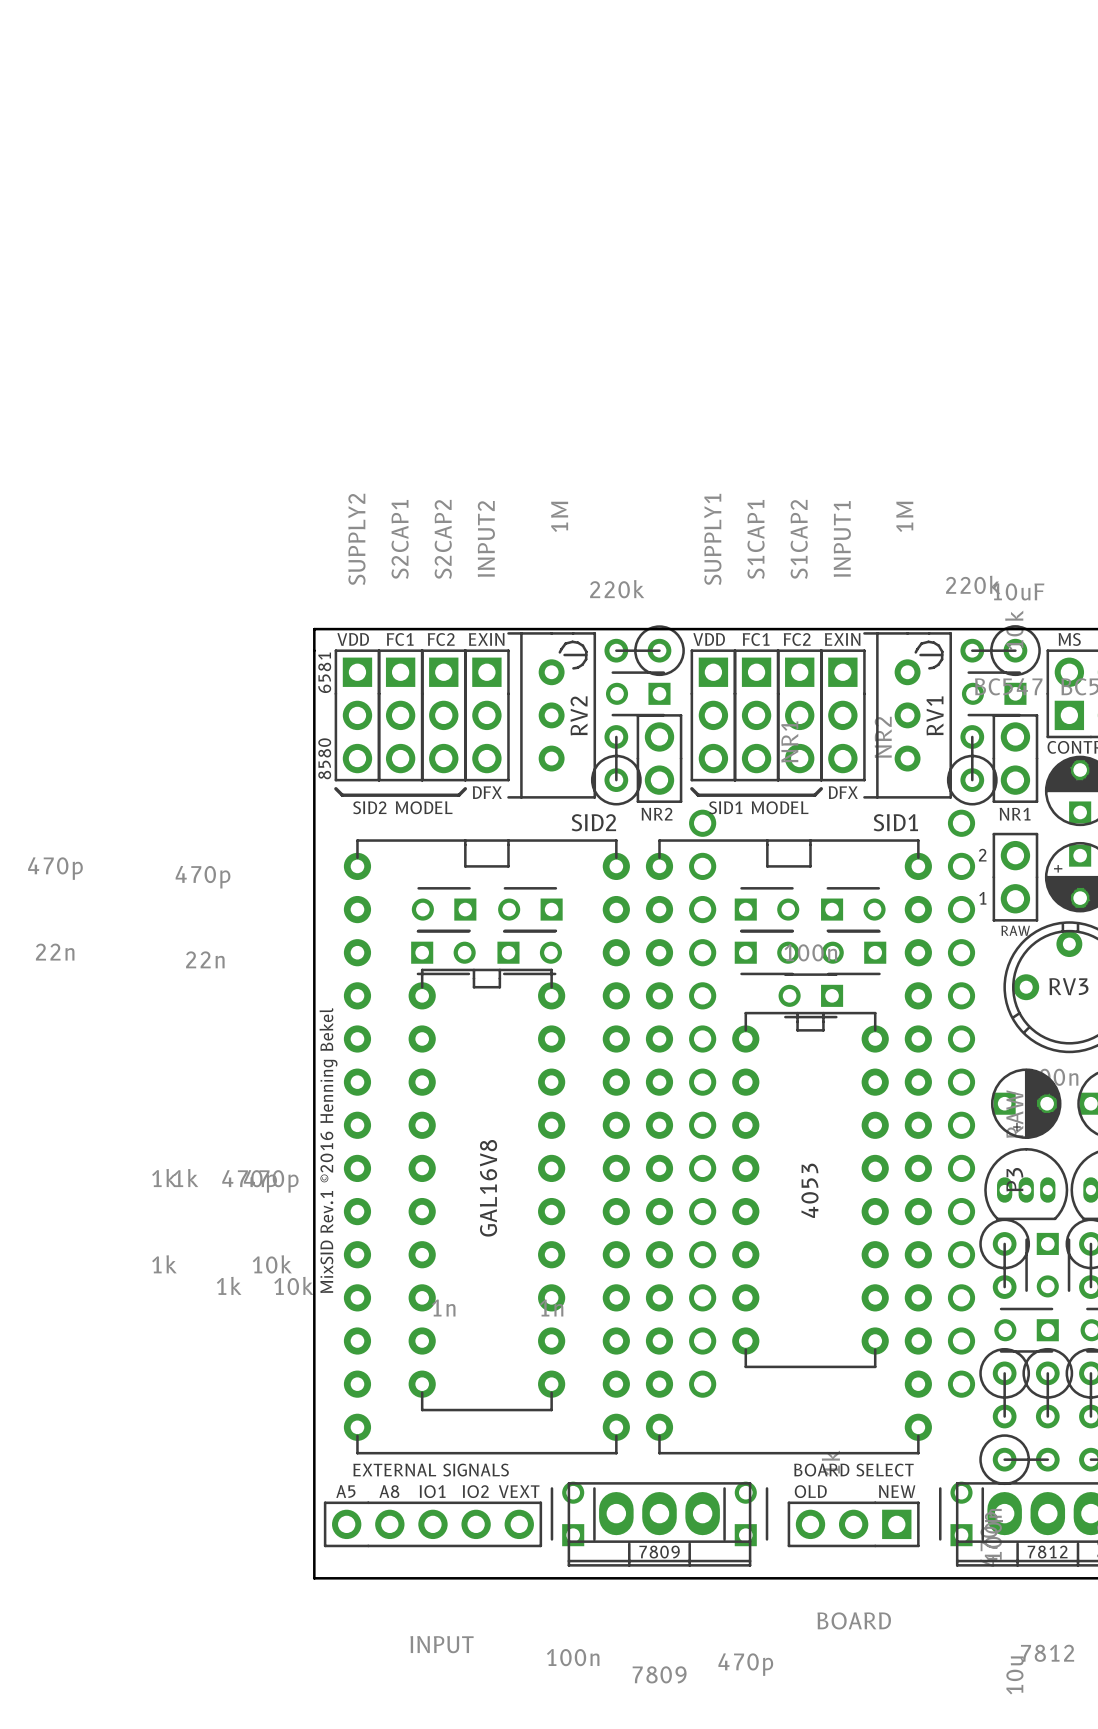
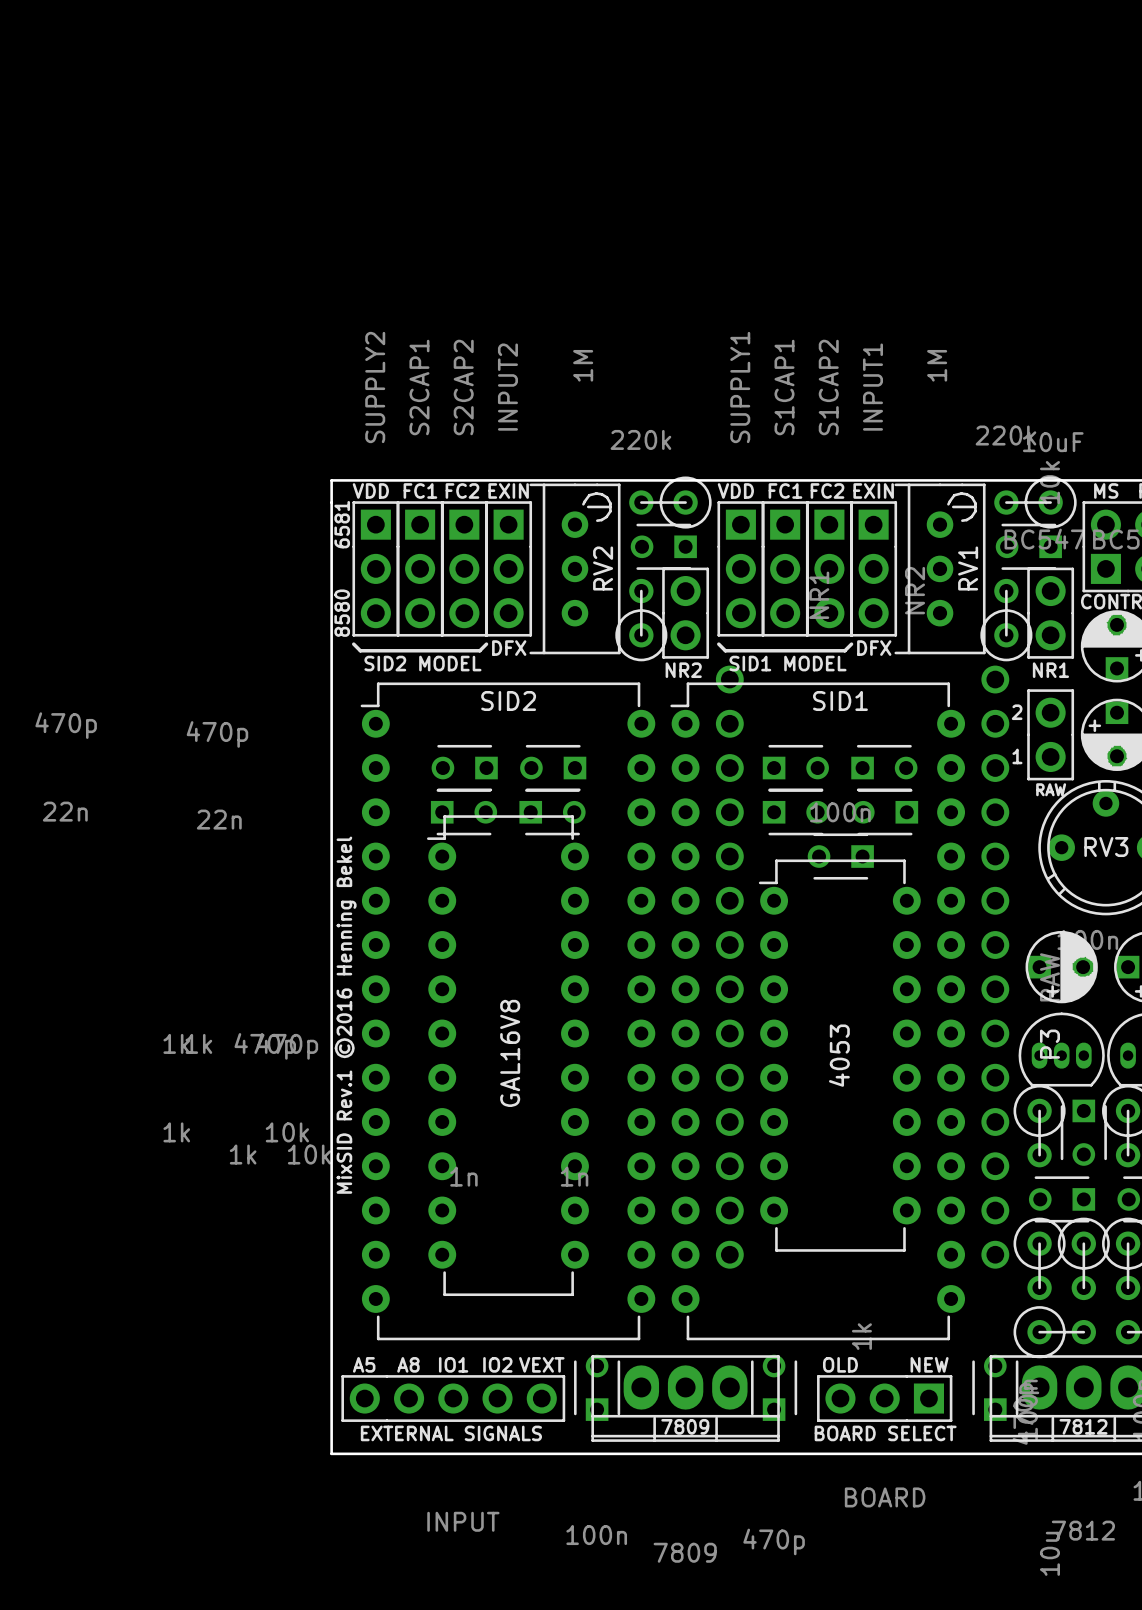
part value position: SID2 (593, 822) -> SID2 (508, 701)
part value position: SID1 (895, 822) -> SID1 (840, 701)
part footprint: [343, 839, 630, 1455] -> [360, 682, 656, 1341]
part footprint: [645, 839, 932, 1455] -> [670, 682, 966, 1341]
part footprint: [408, 968, 566, 1412] -> [426, 815, 589, 1297]
part footprint: [732, 1011, 889, 1369] -> [758, 859, 921, 1252]
text position: EXTERNAL SIGNALS (431, 1470) -> EXTERNAL SIGNALS (451, 1433)
text position: BOARD SELECT (853, 1470) -> BOARD SELECT (885, 1433)

